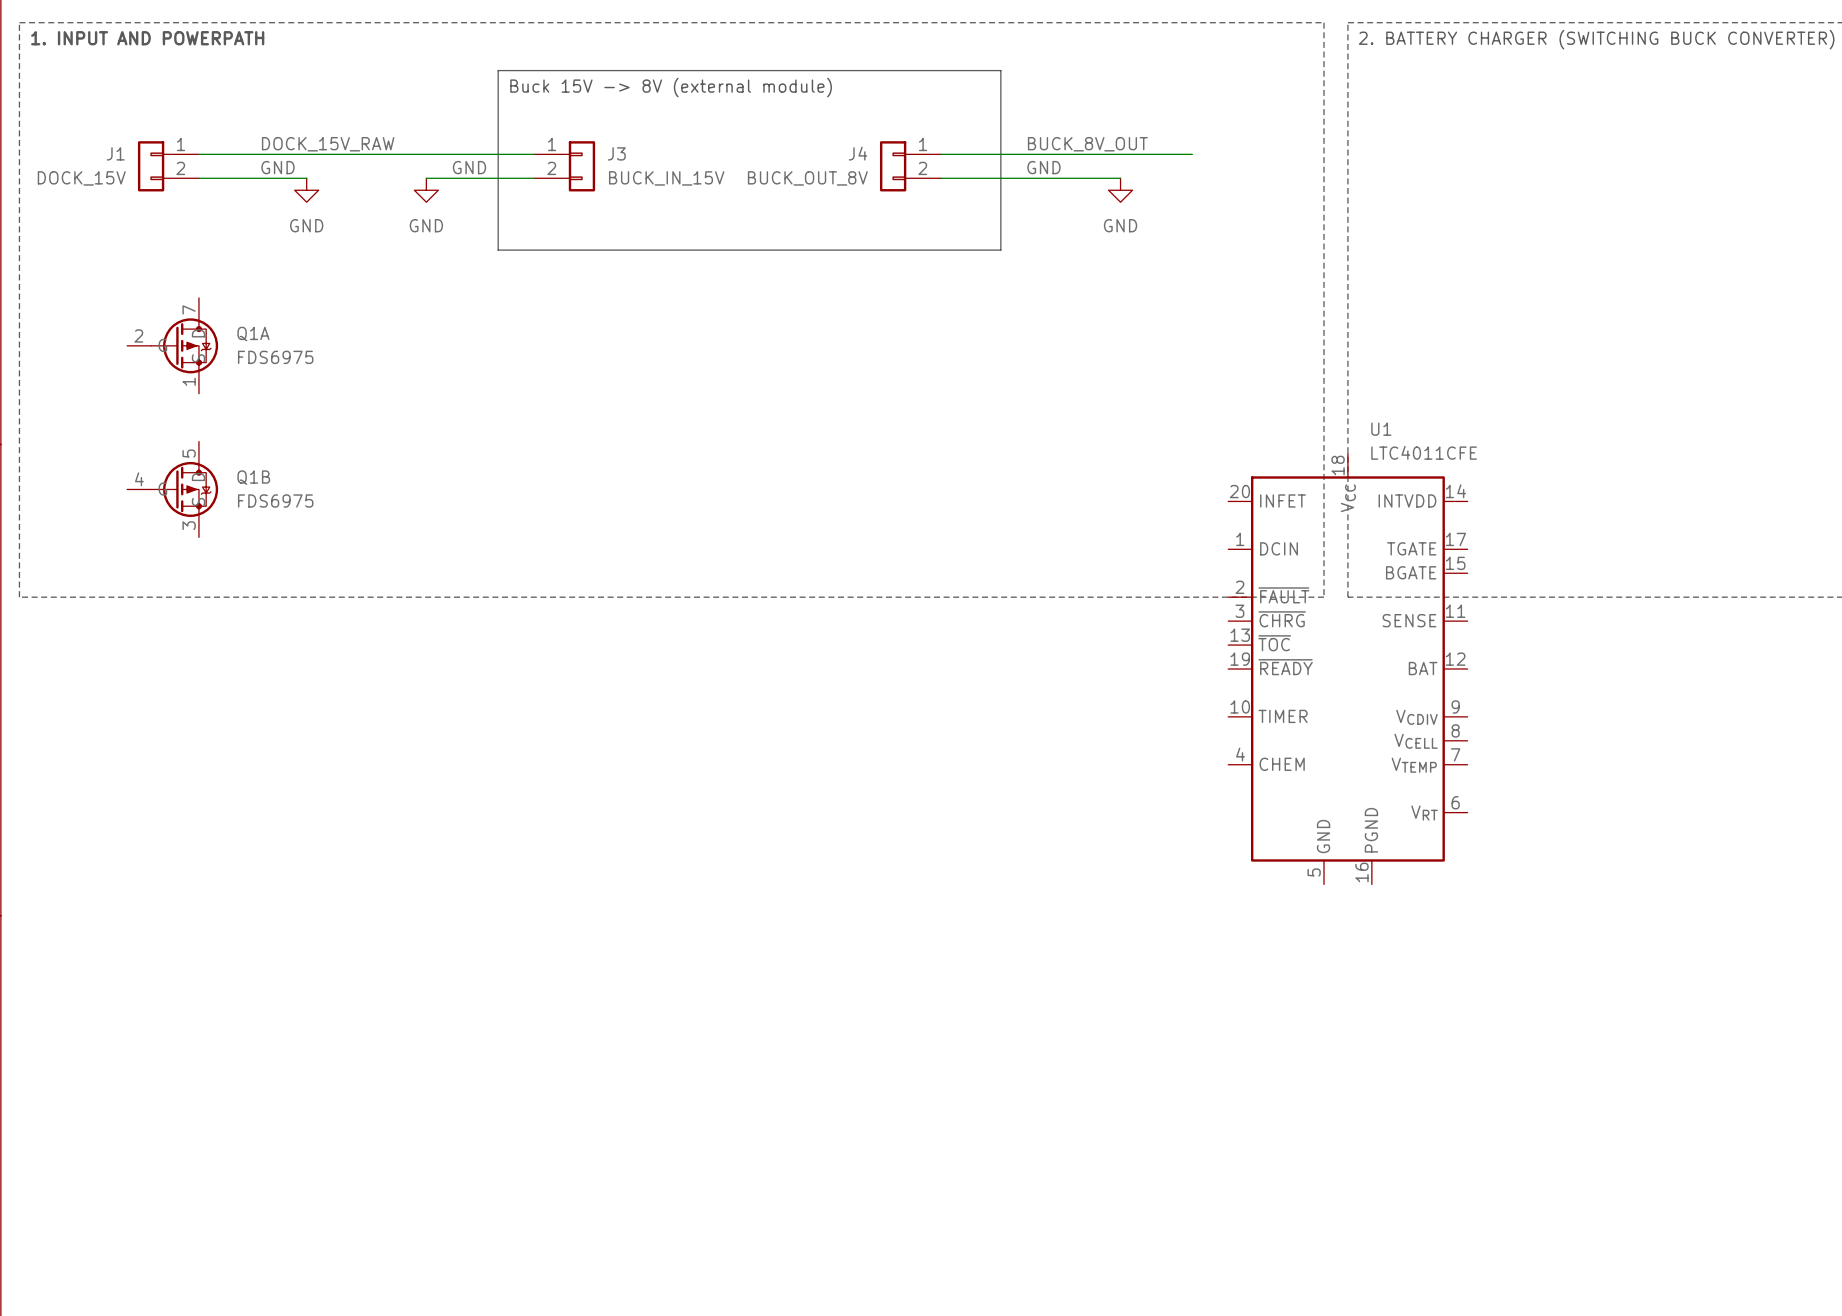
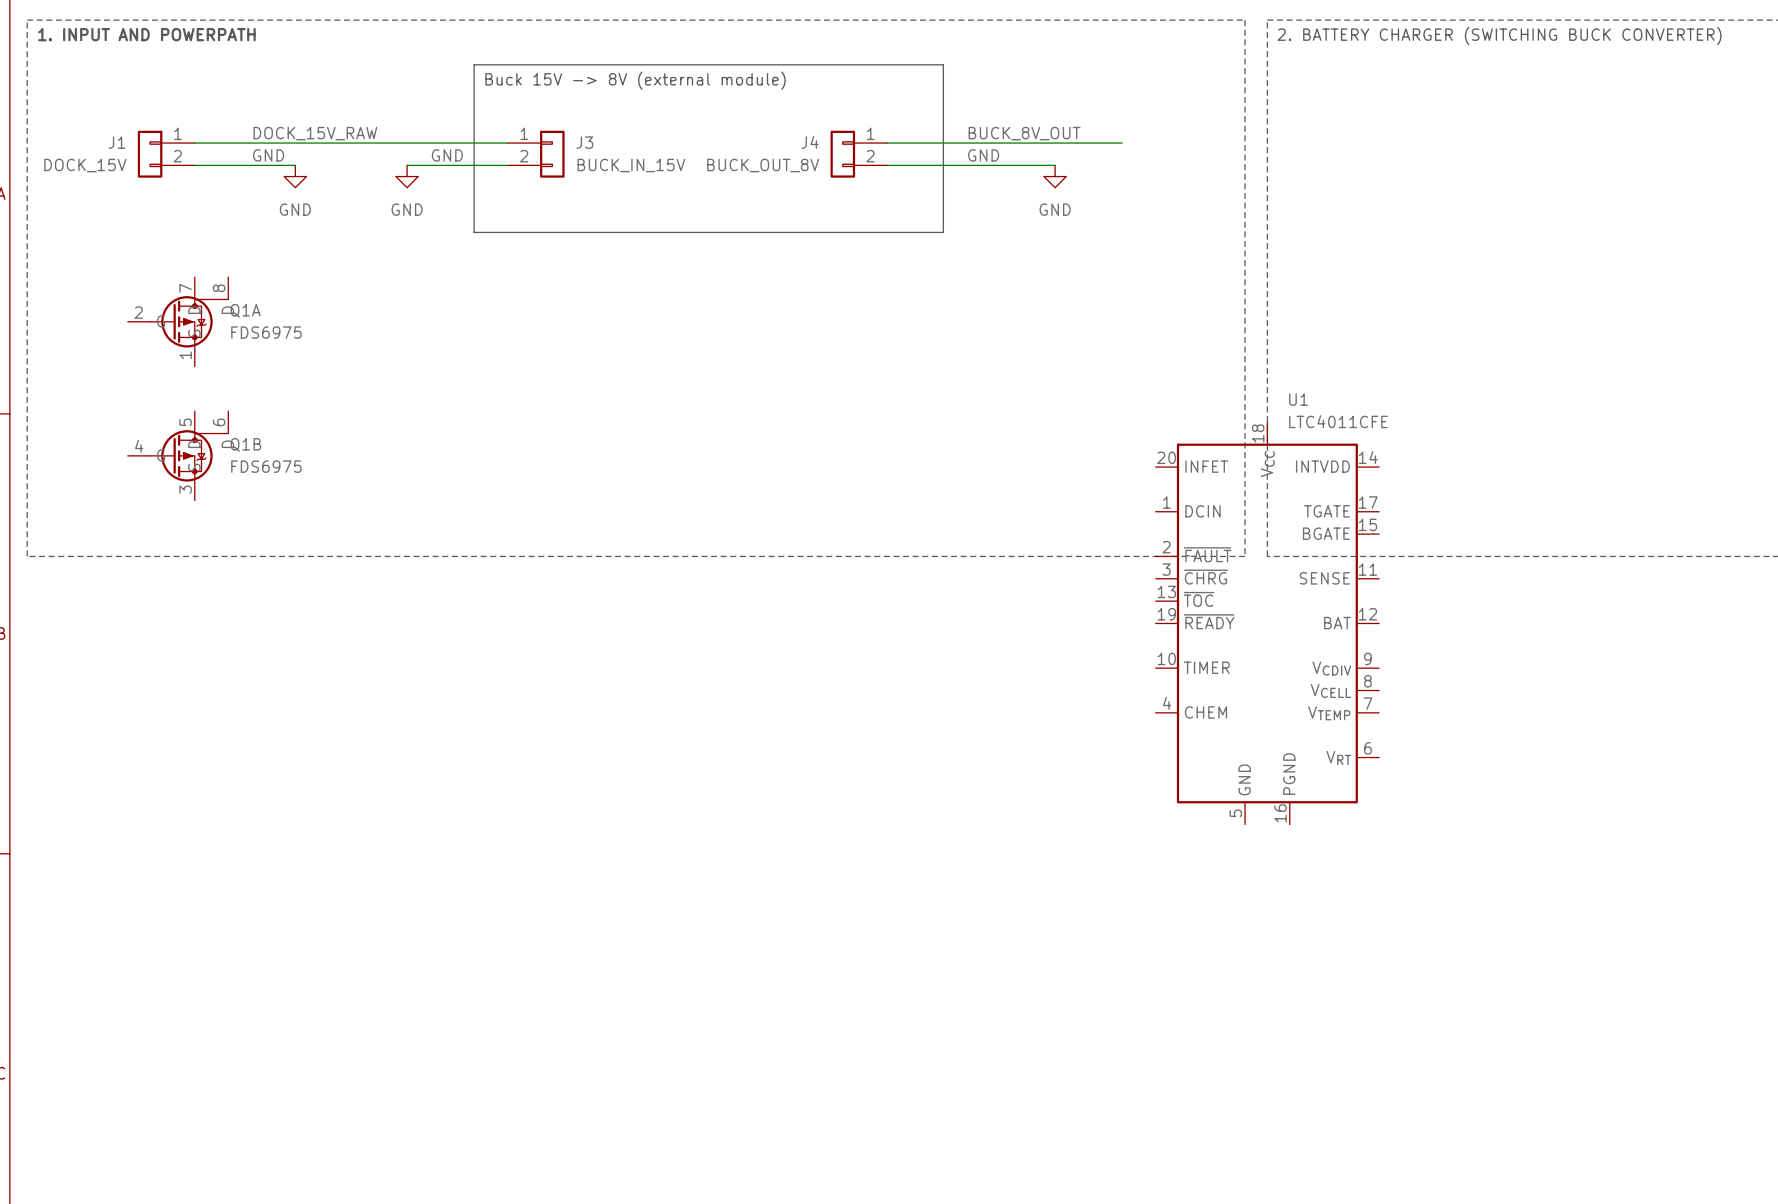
Q1A symbol: [127, 297, 219, 394] -> [127, 277, 229, 367]
Q1B symbol: [127, 441, 219, 538] -> [127, 411, 229, 501]

